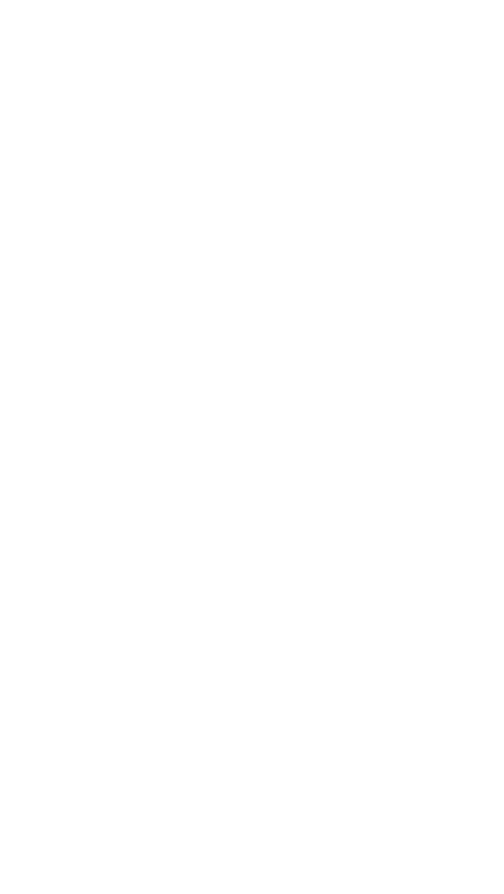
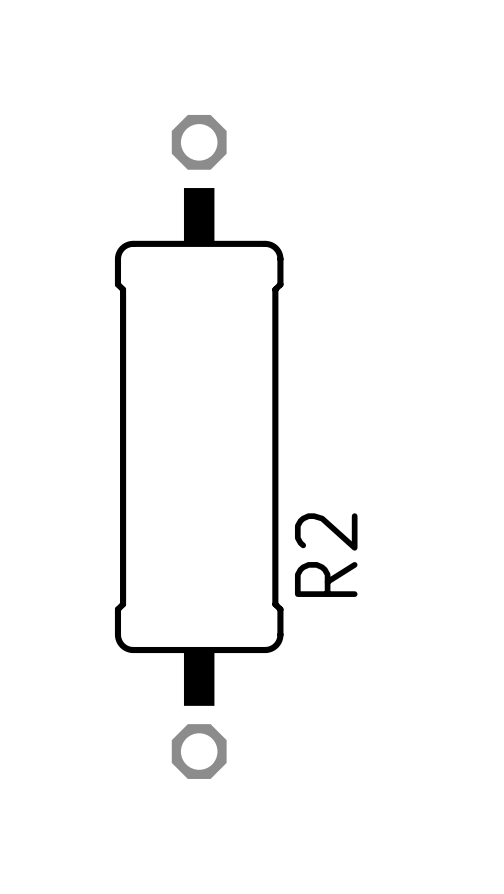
R2: none -> (199, 446)

